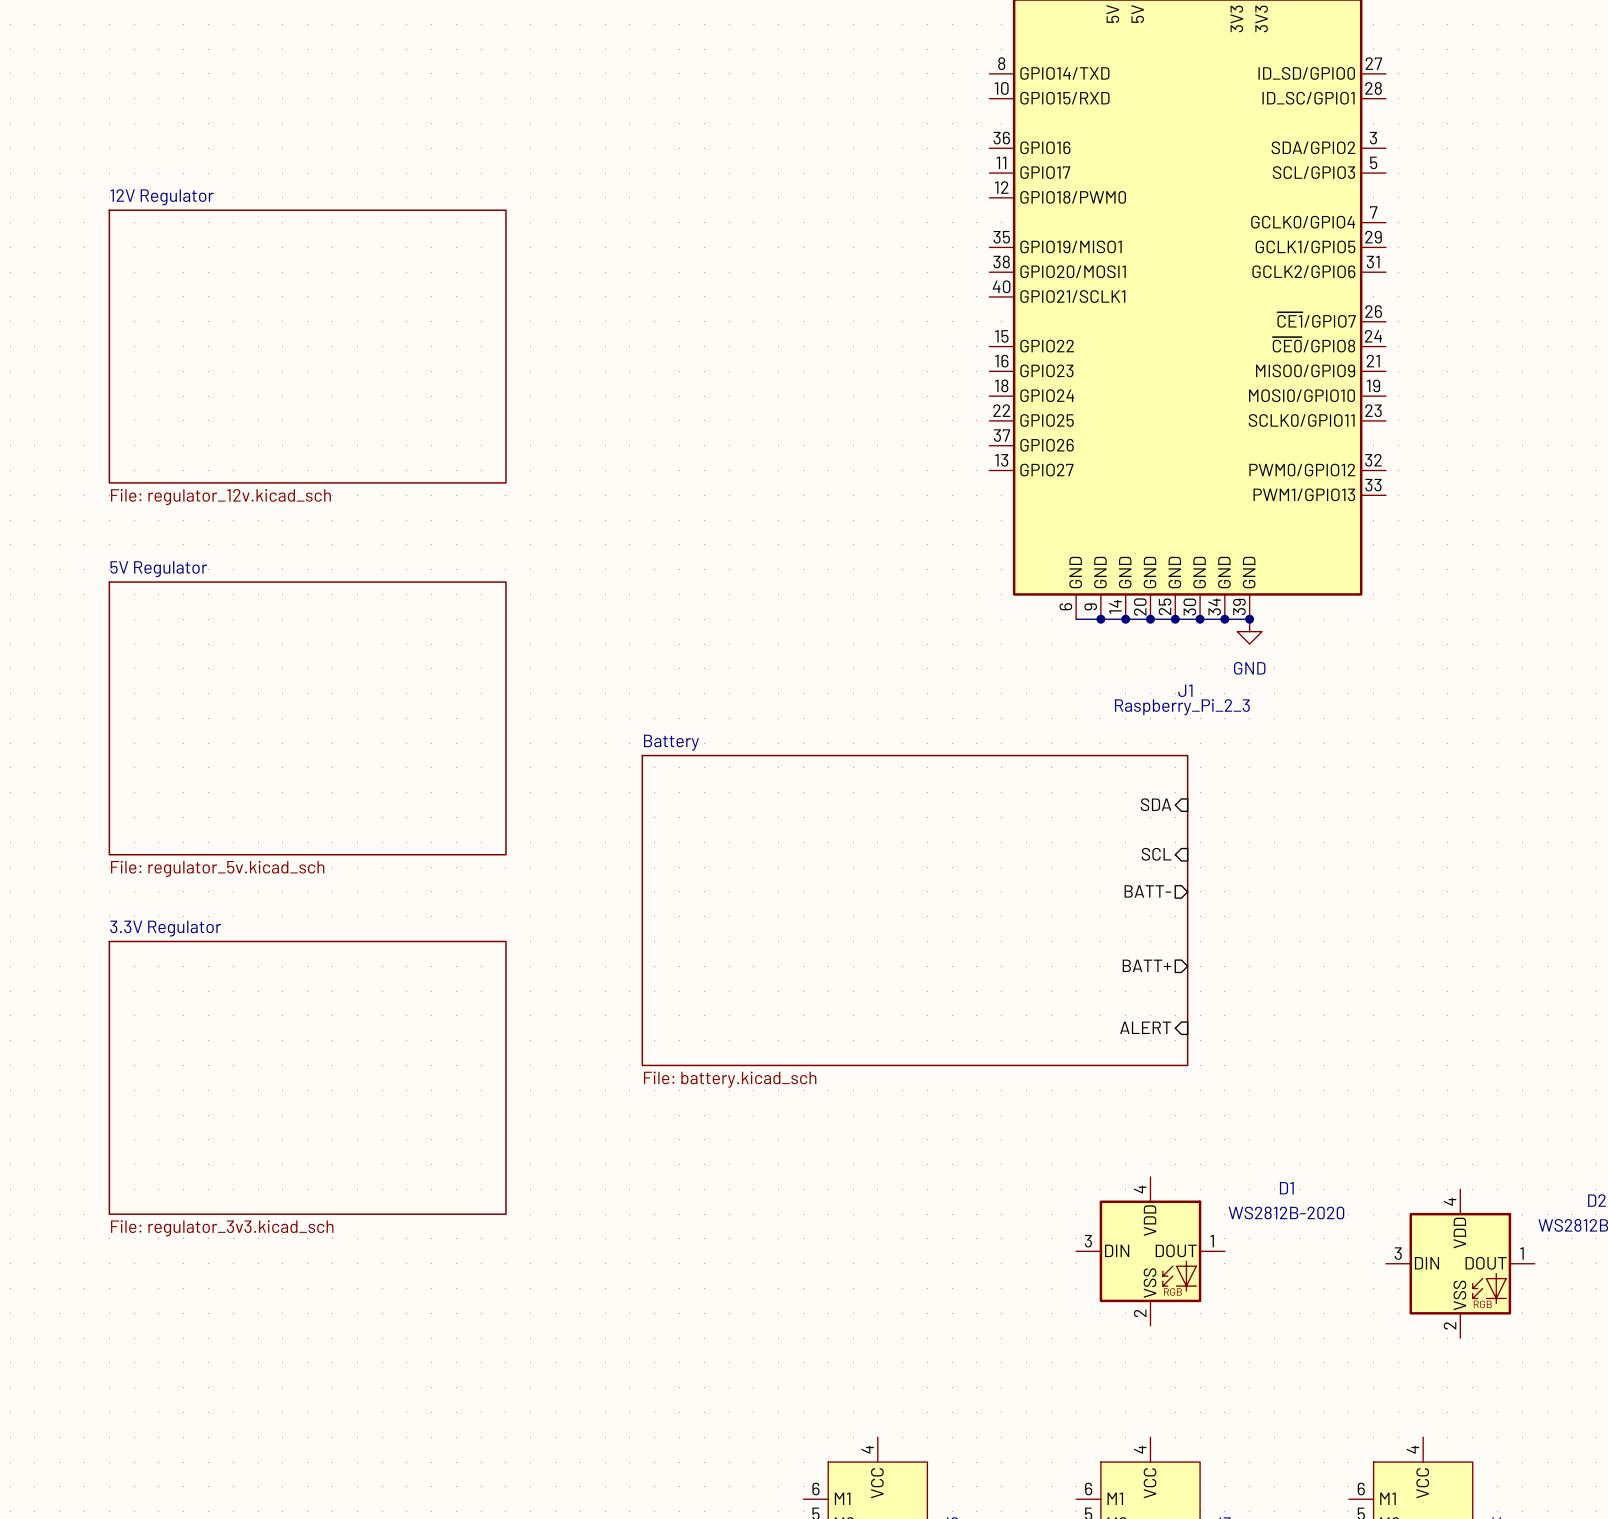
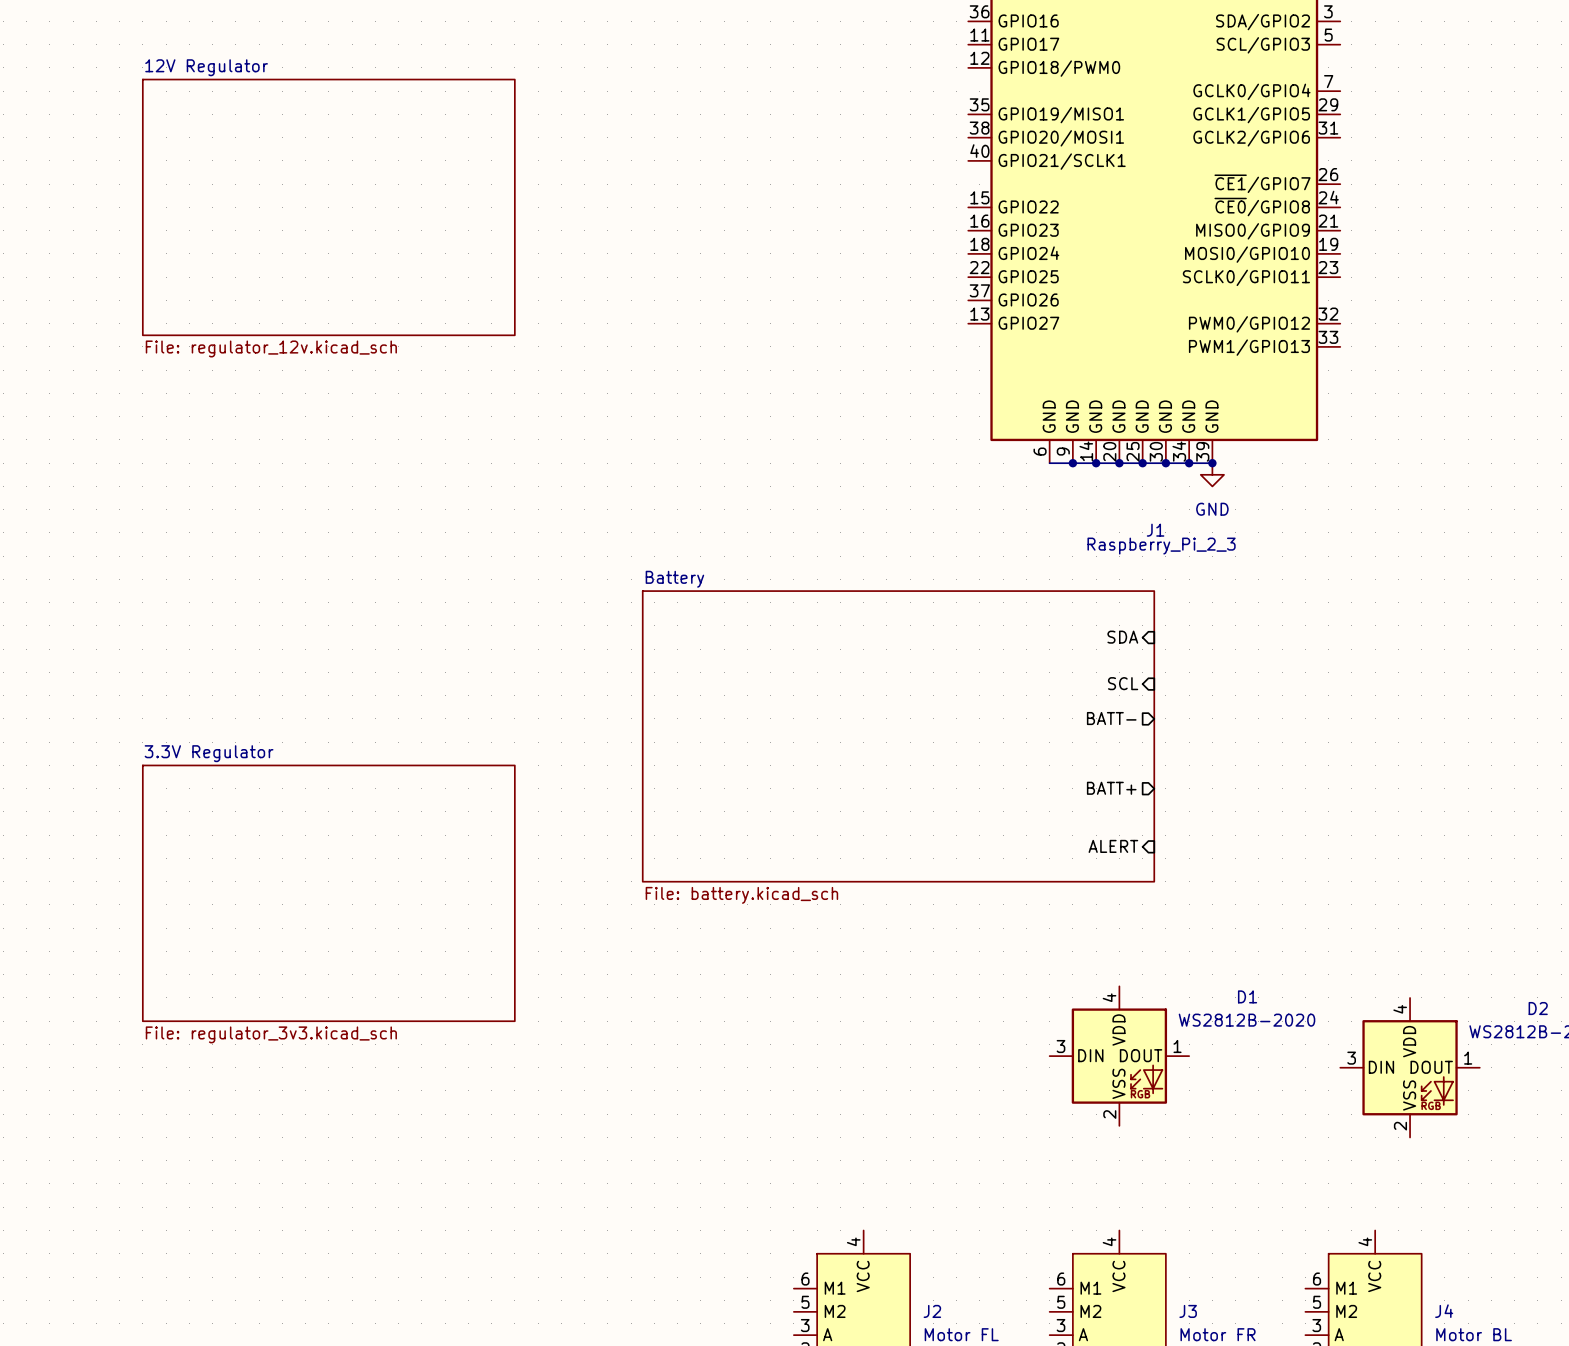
sheet 5V Regulator: File: regulator_5v.kicad_sch (307, 718) -> none

